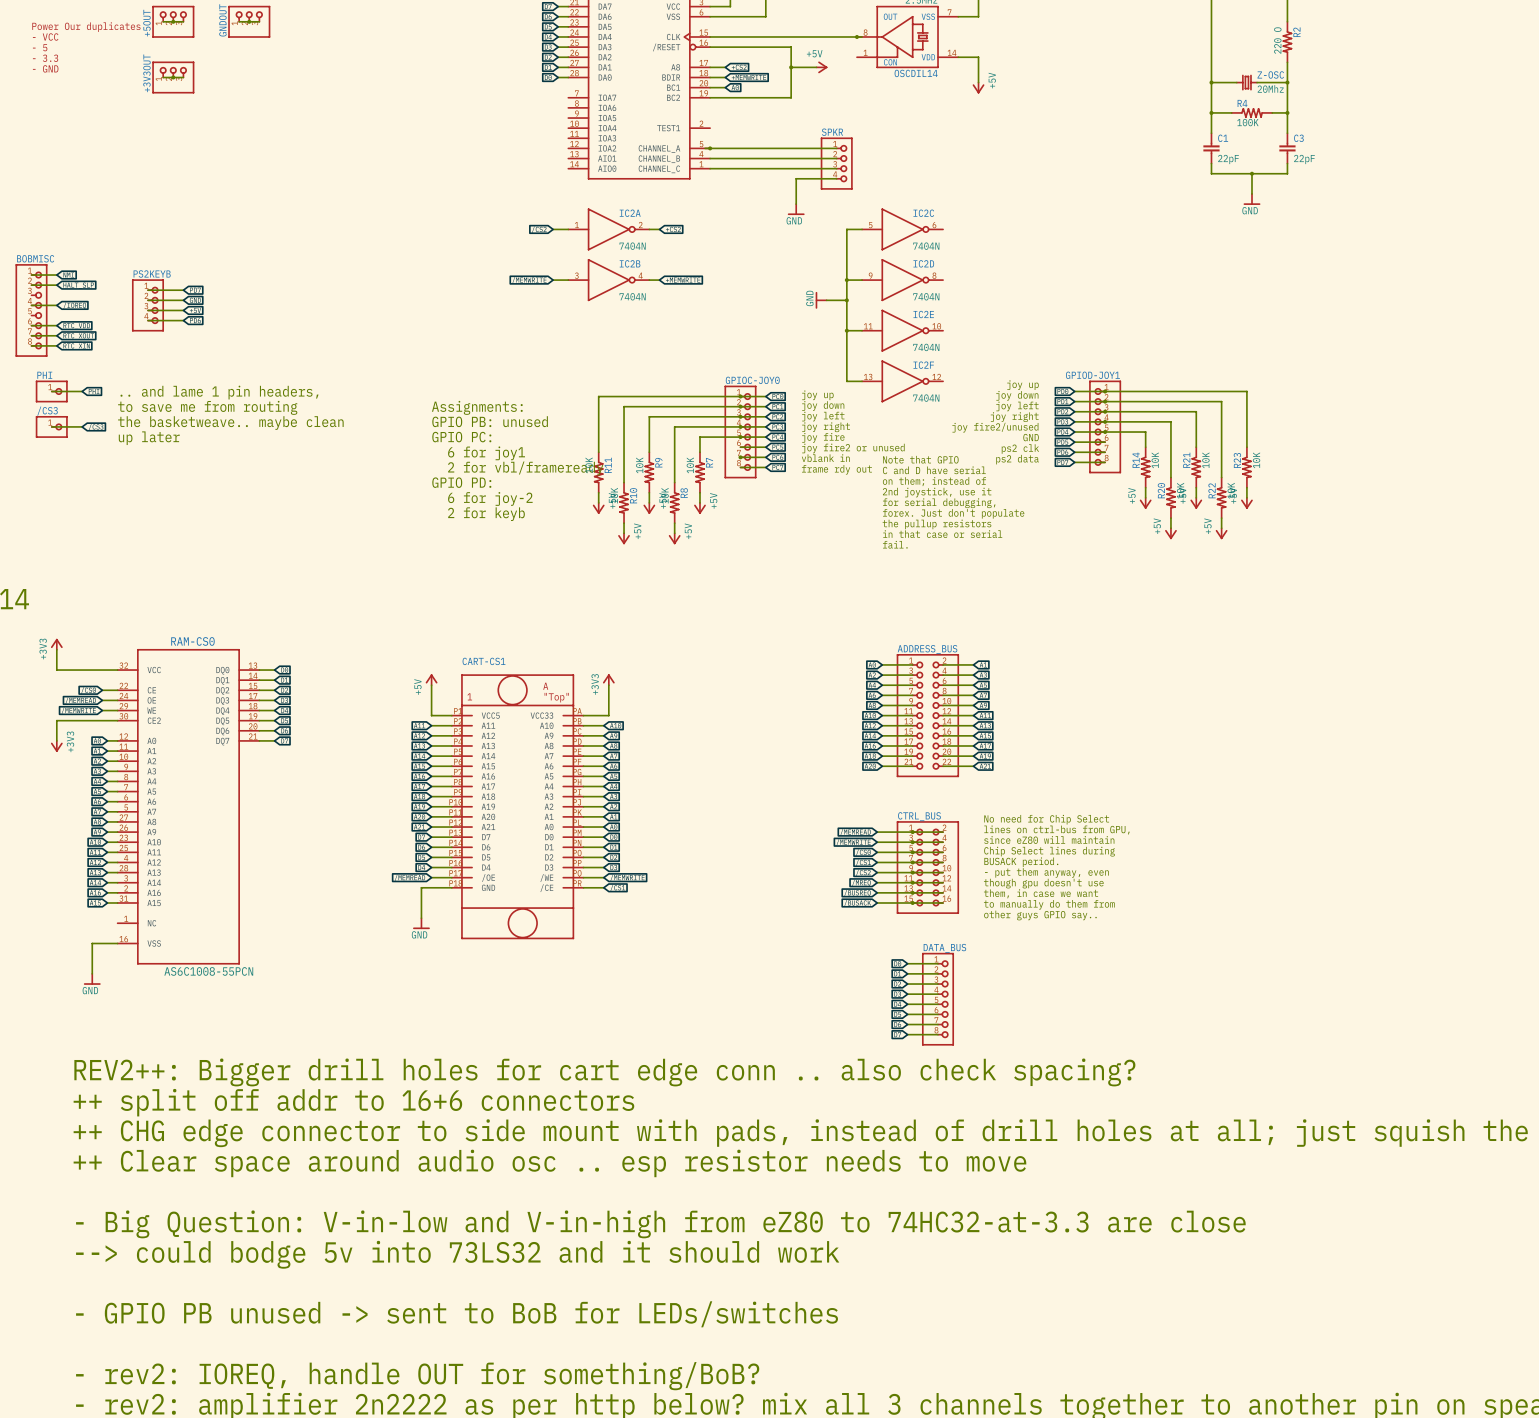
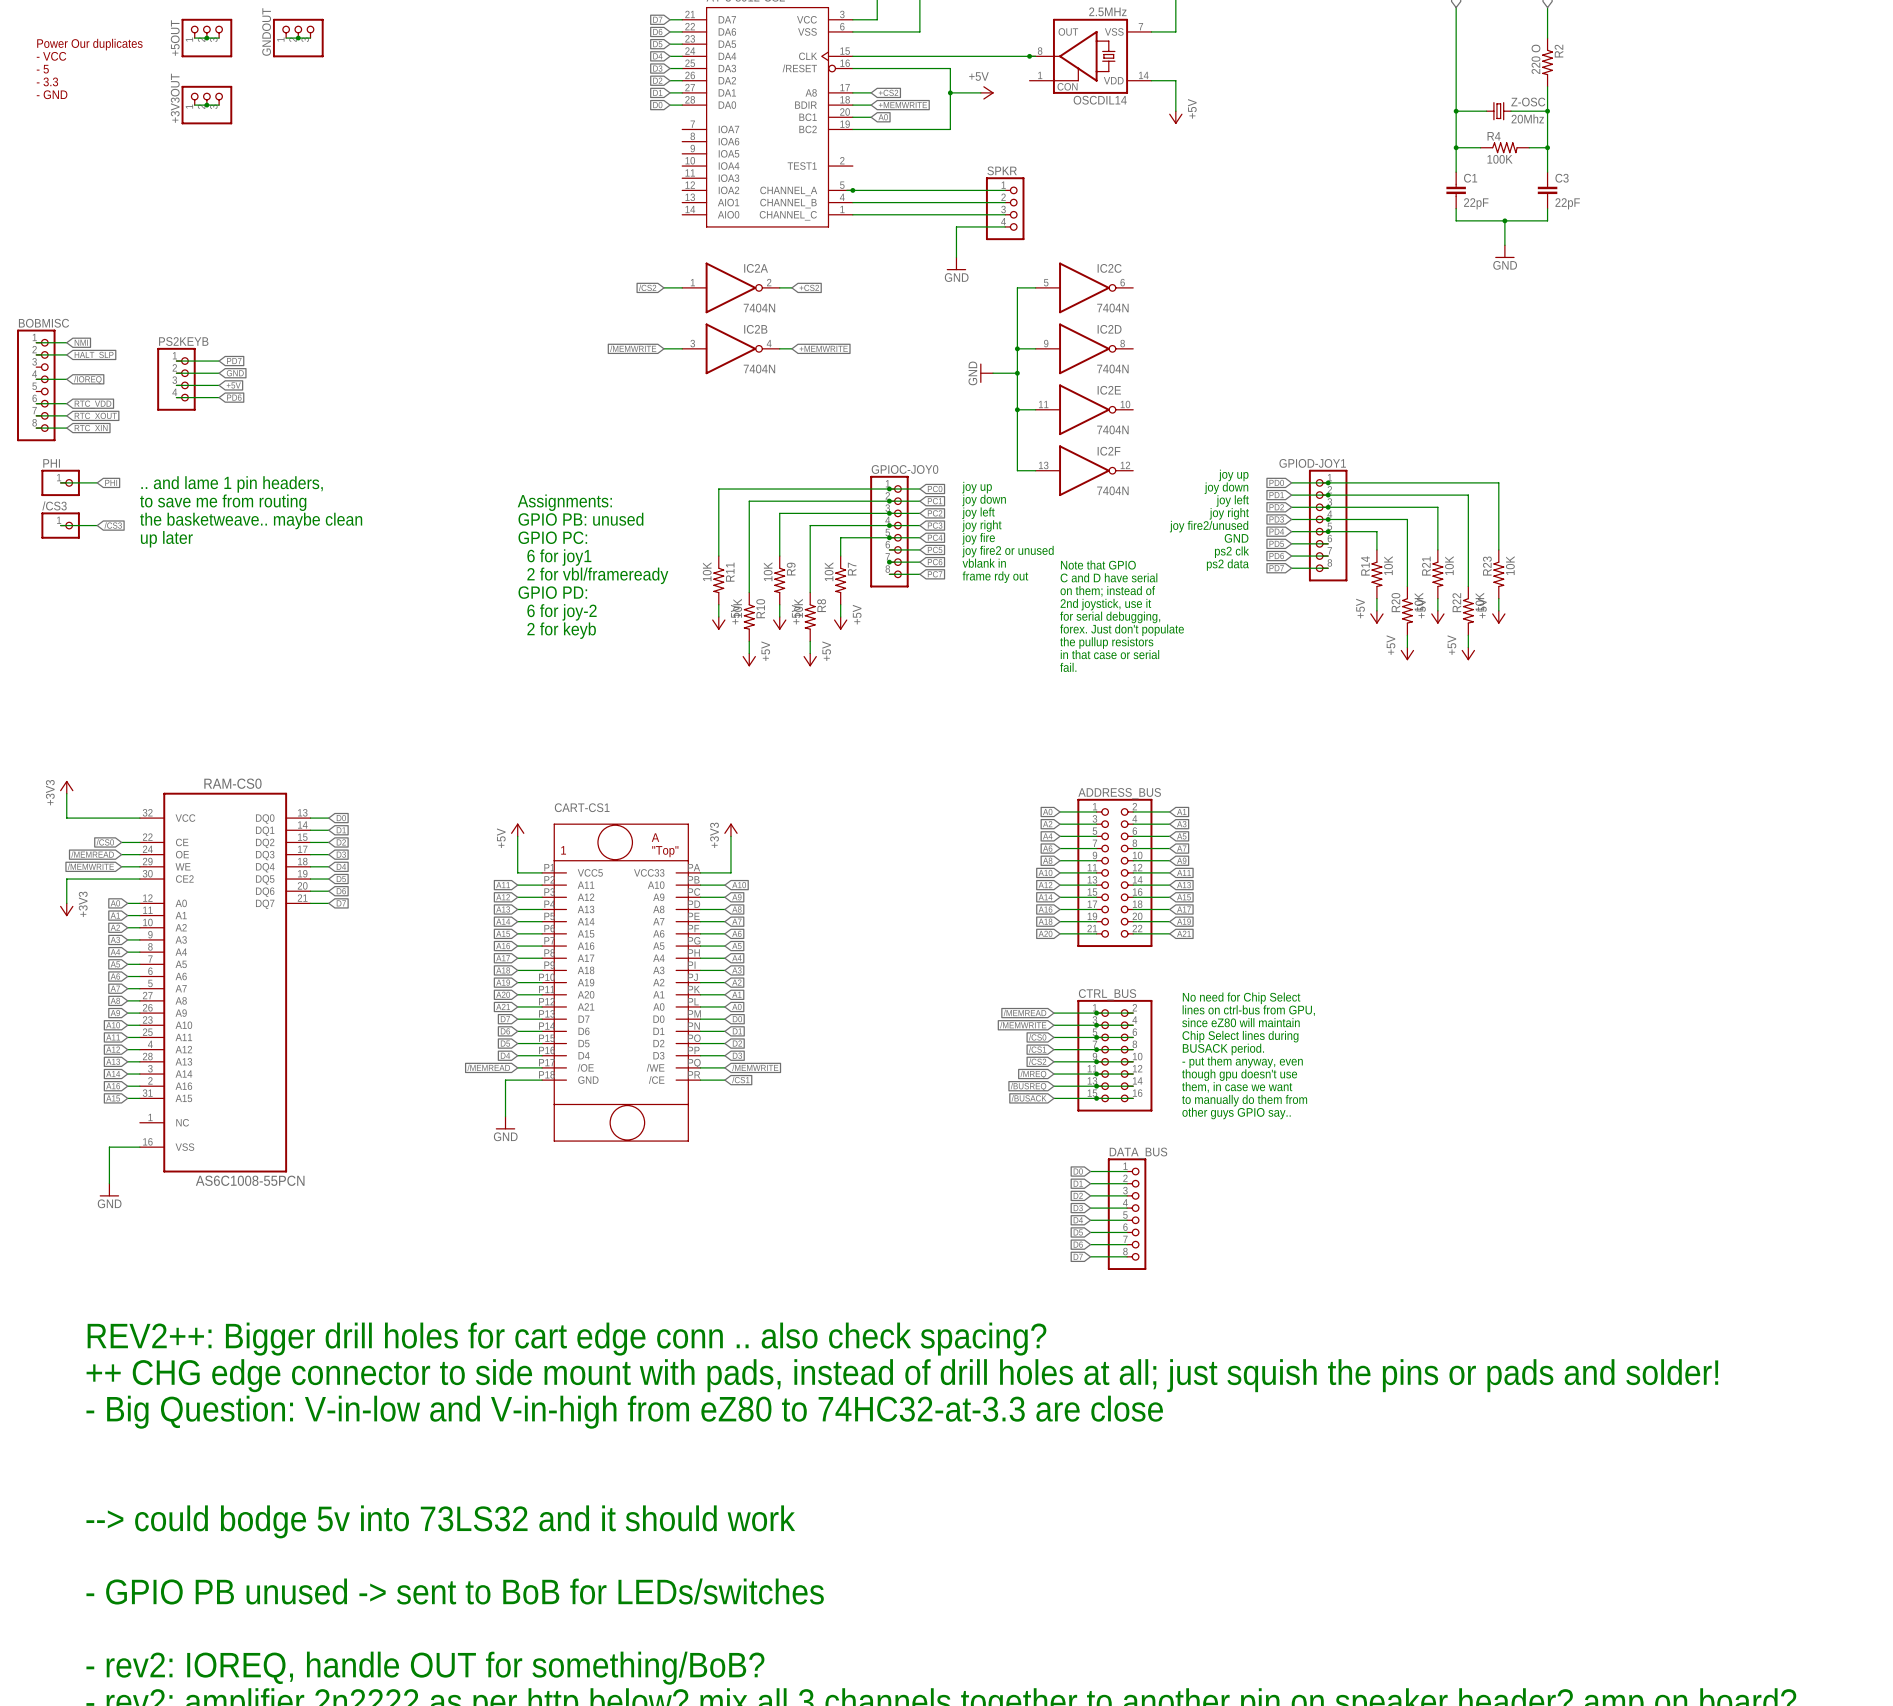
text: REV2++: Bigger drill holes for cart edge conn .. also check spacing? (604, 1072) -> none
text: ++ split off addr to 16+6 connectors (353, 1102) -> REV2++: Bigger drill holes for cart edge conn .. also check spacing? (566, 1339)
text: ++ Clear space around audio osc .. esp resistor needs to move (549, 1163) -> - Big Question: V-in-low and V-in-high from eZ80 to 74HC32-at-3.3 are close (624, 1412)
text: - Big Question: V-in-low and V-in-high from eZ80 to 74HC32-at-3.3 are close (660, 1224) -> none

